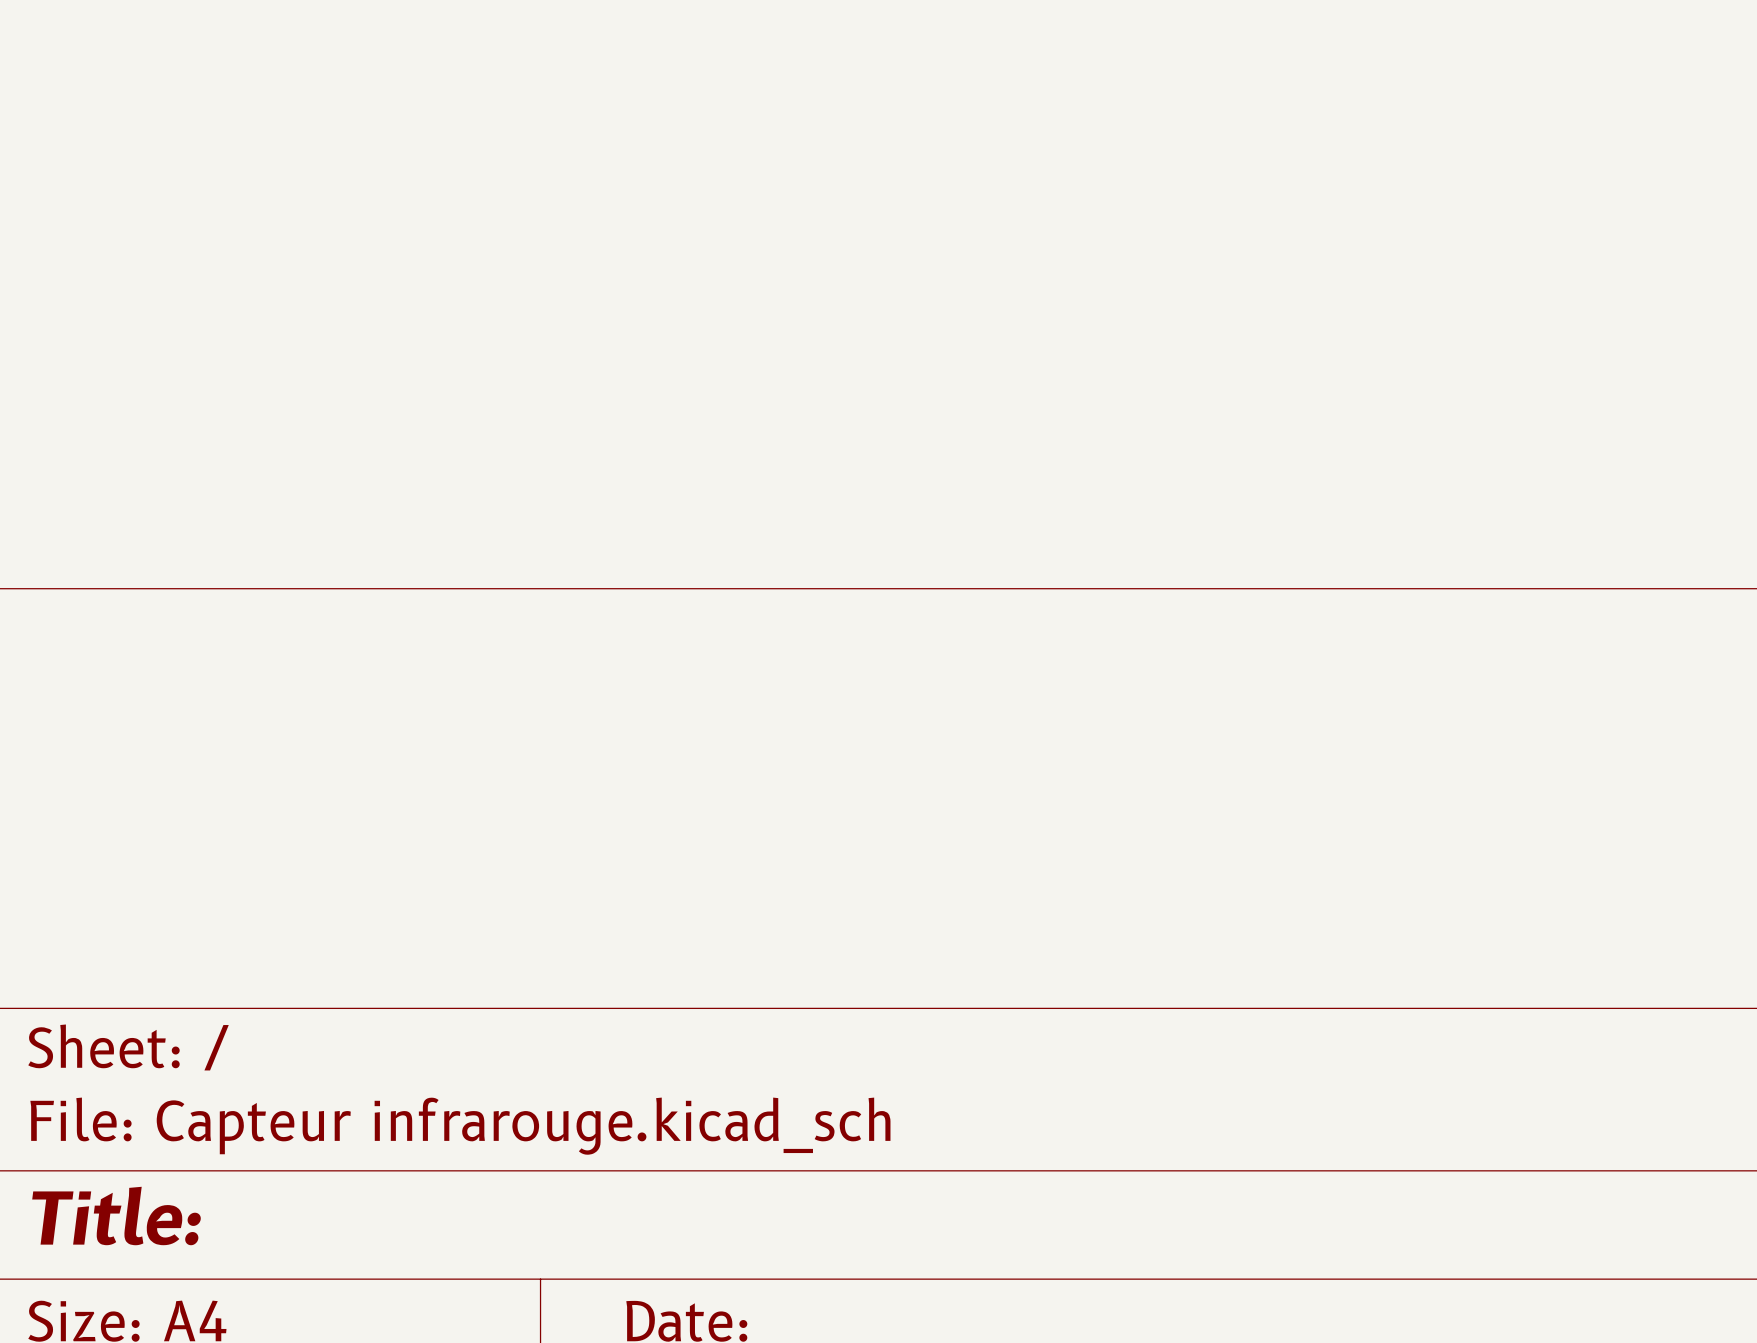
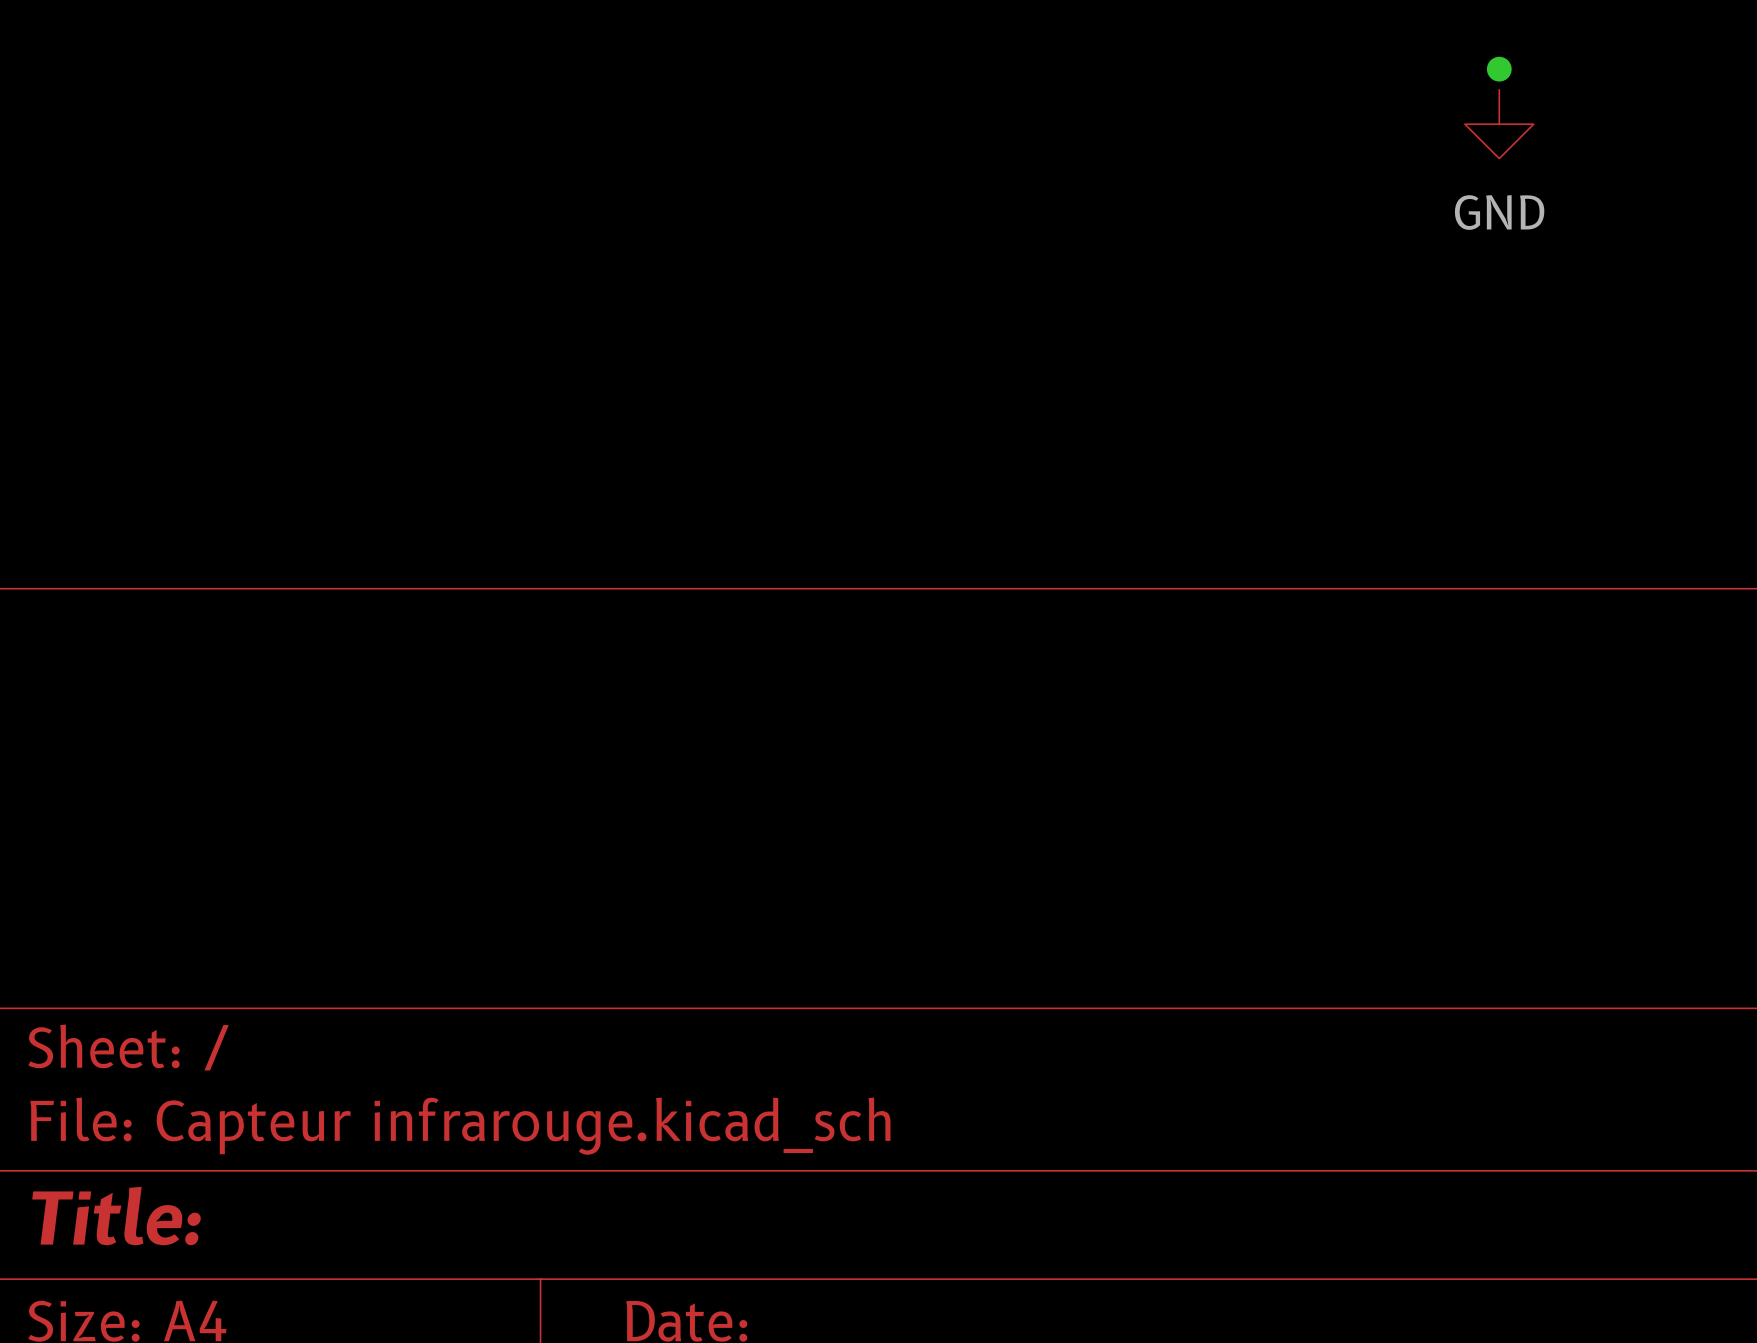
junction: none -> (1499, 69)
power symbol: none -> GND (1499, 124)

